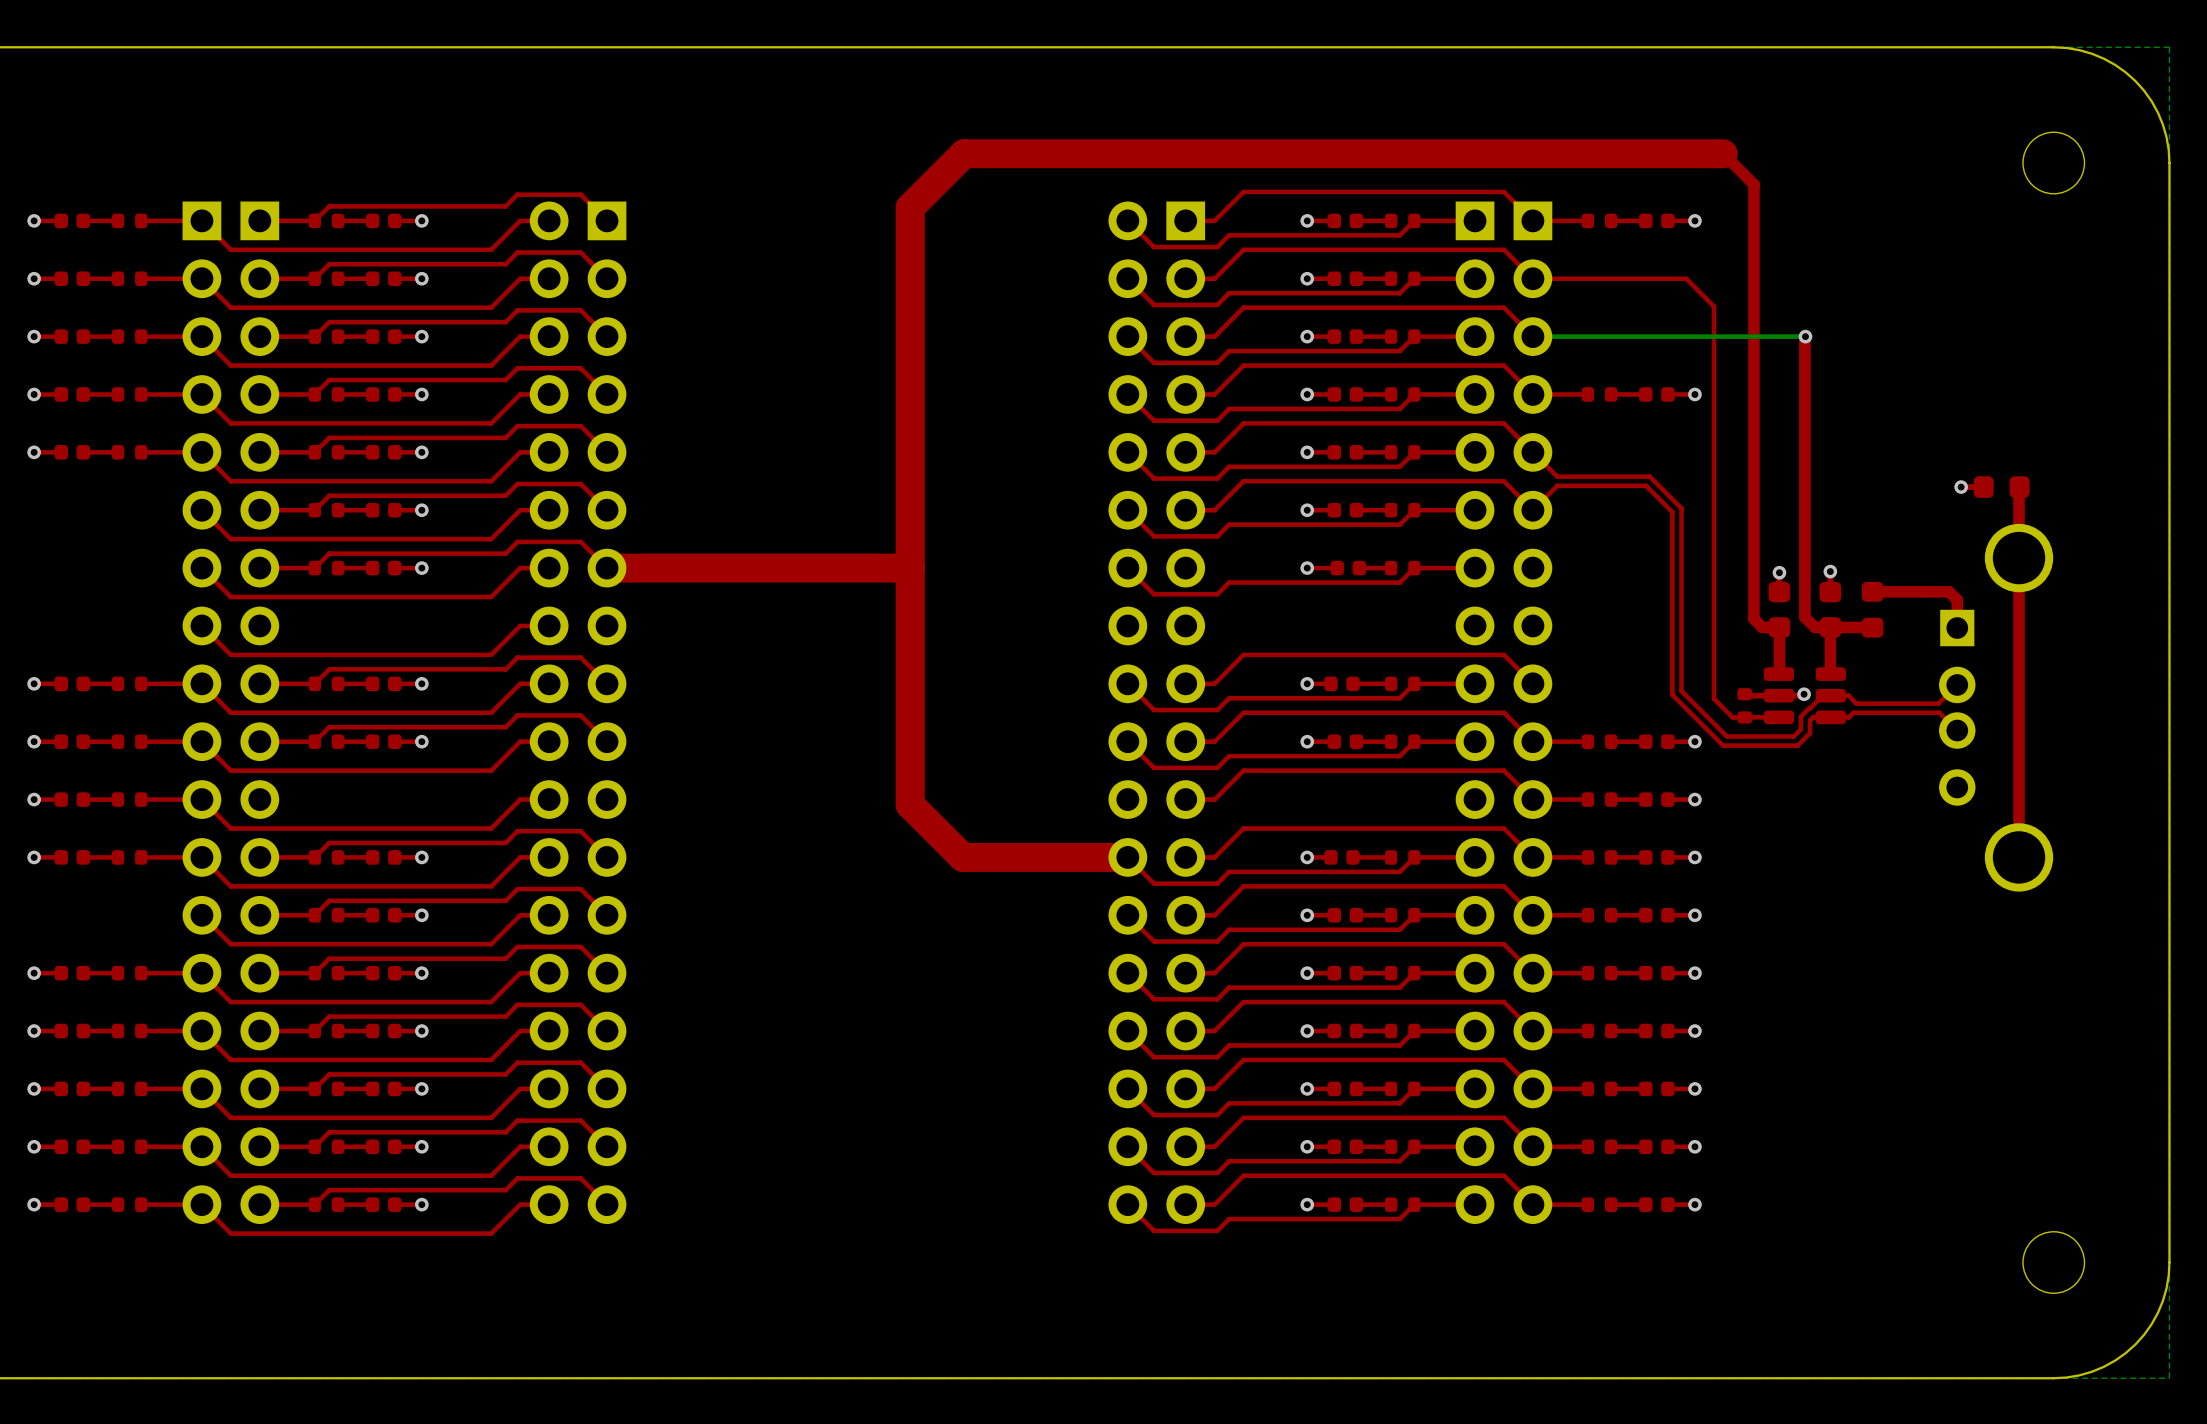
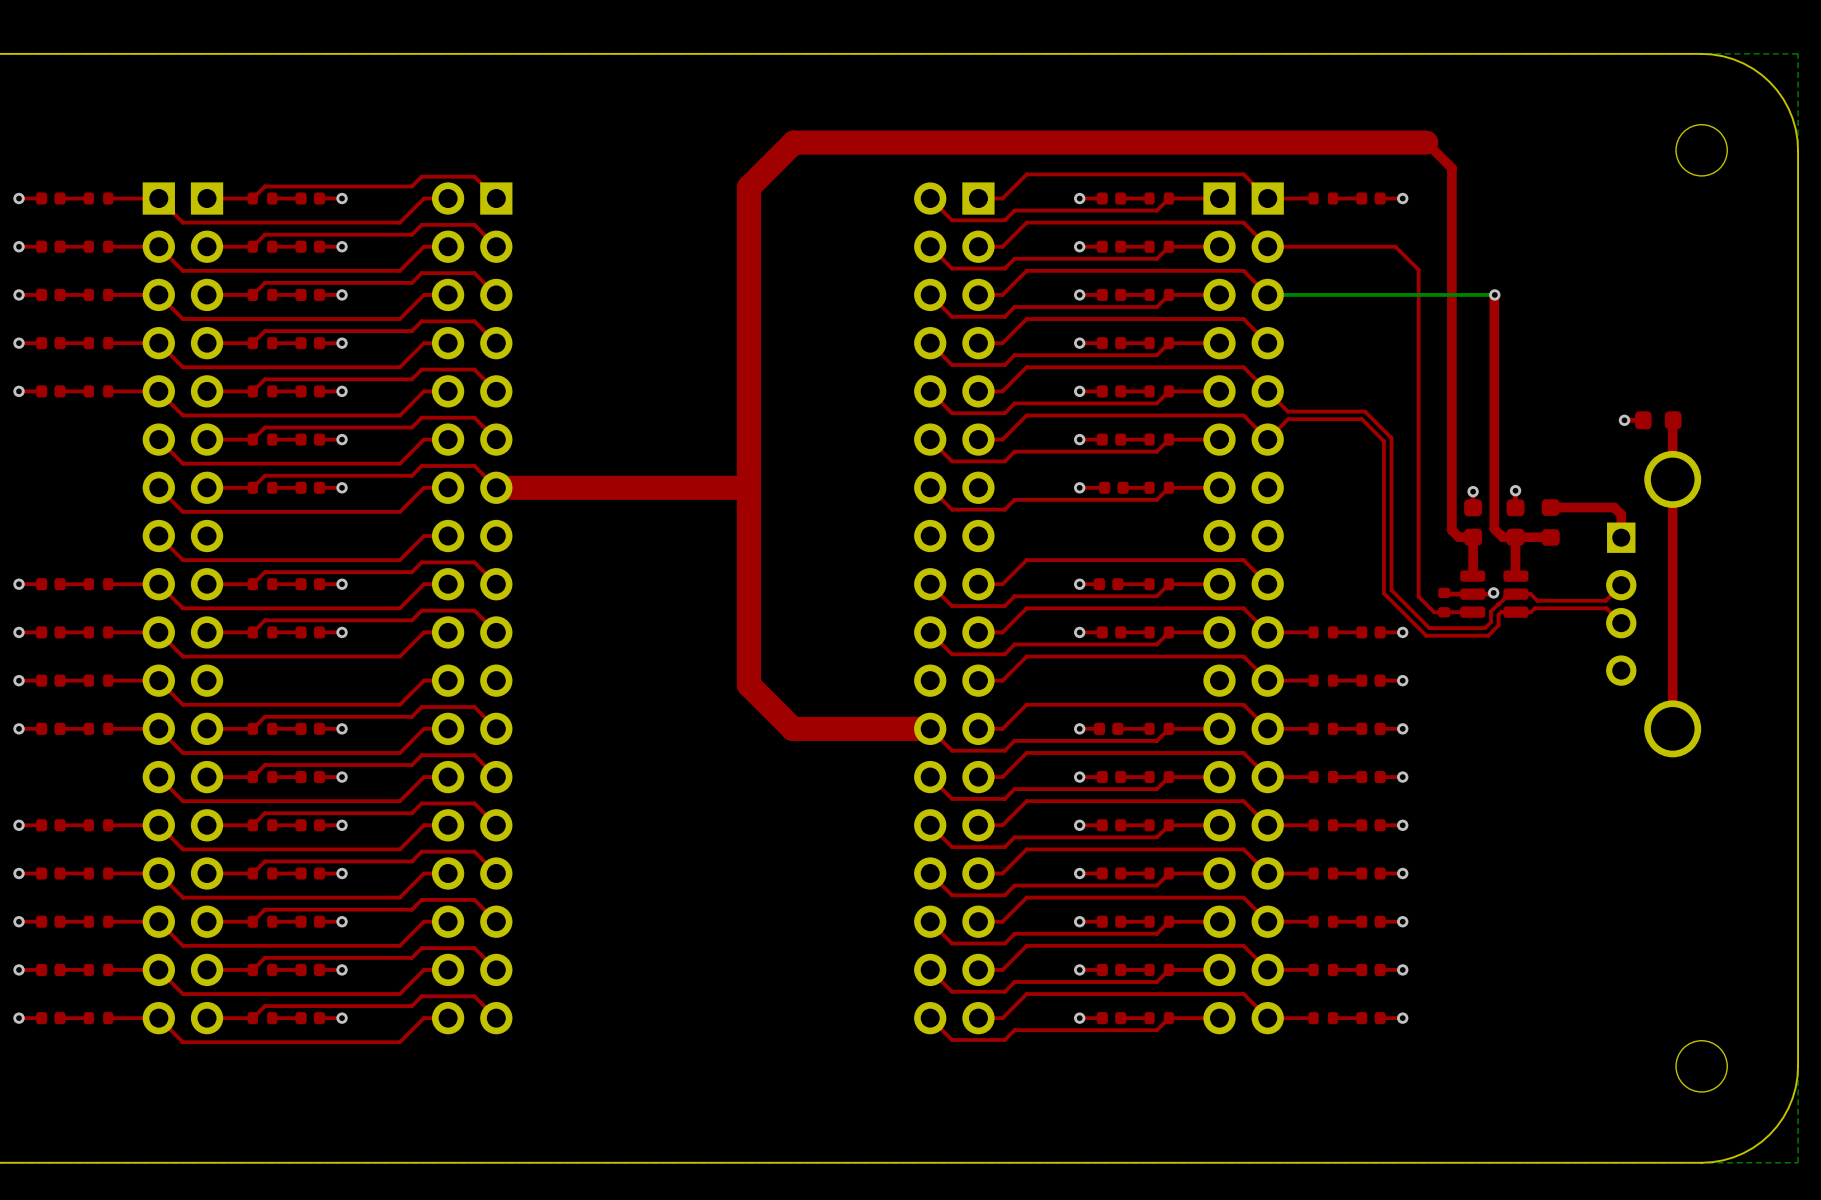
top track: (1587, 394) (1532, 394) -> none
part: (1599, 394) -> none
top track: (1645, 394) (1611, 394) -> none
part: (1656, 394) -> none
top track: (1694, 394) (1667, 394) -> none
via: (1694, 394) -> none

